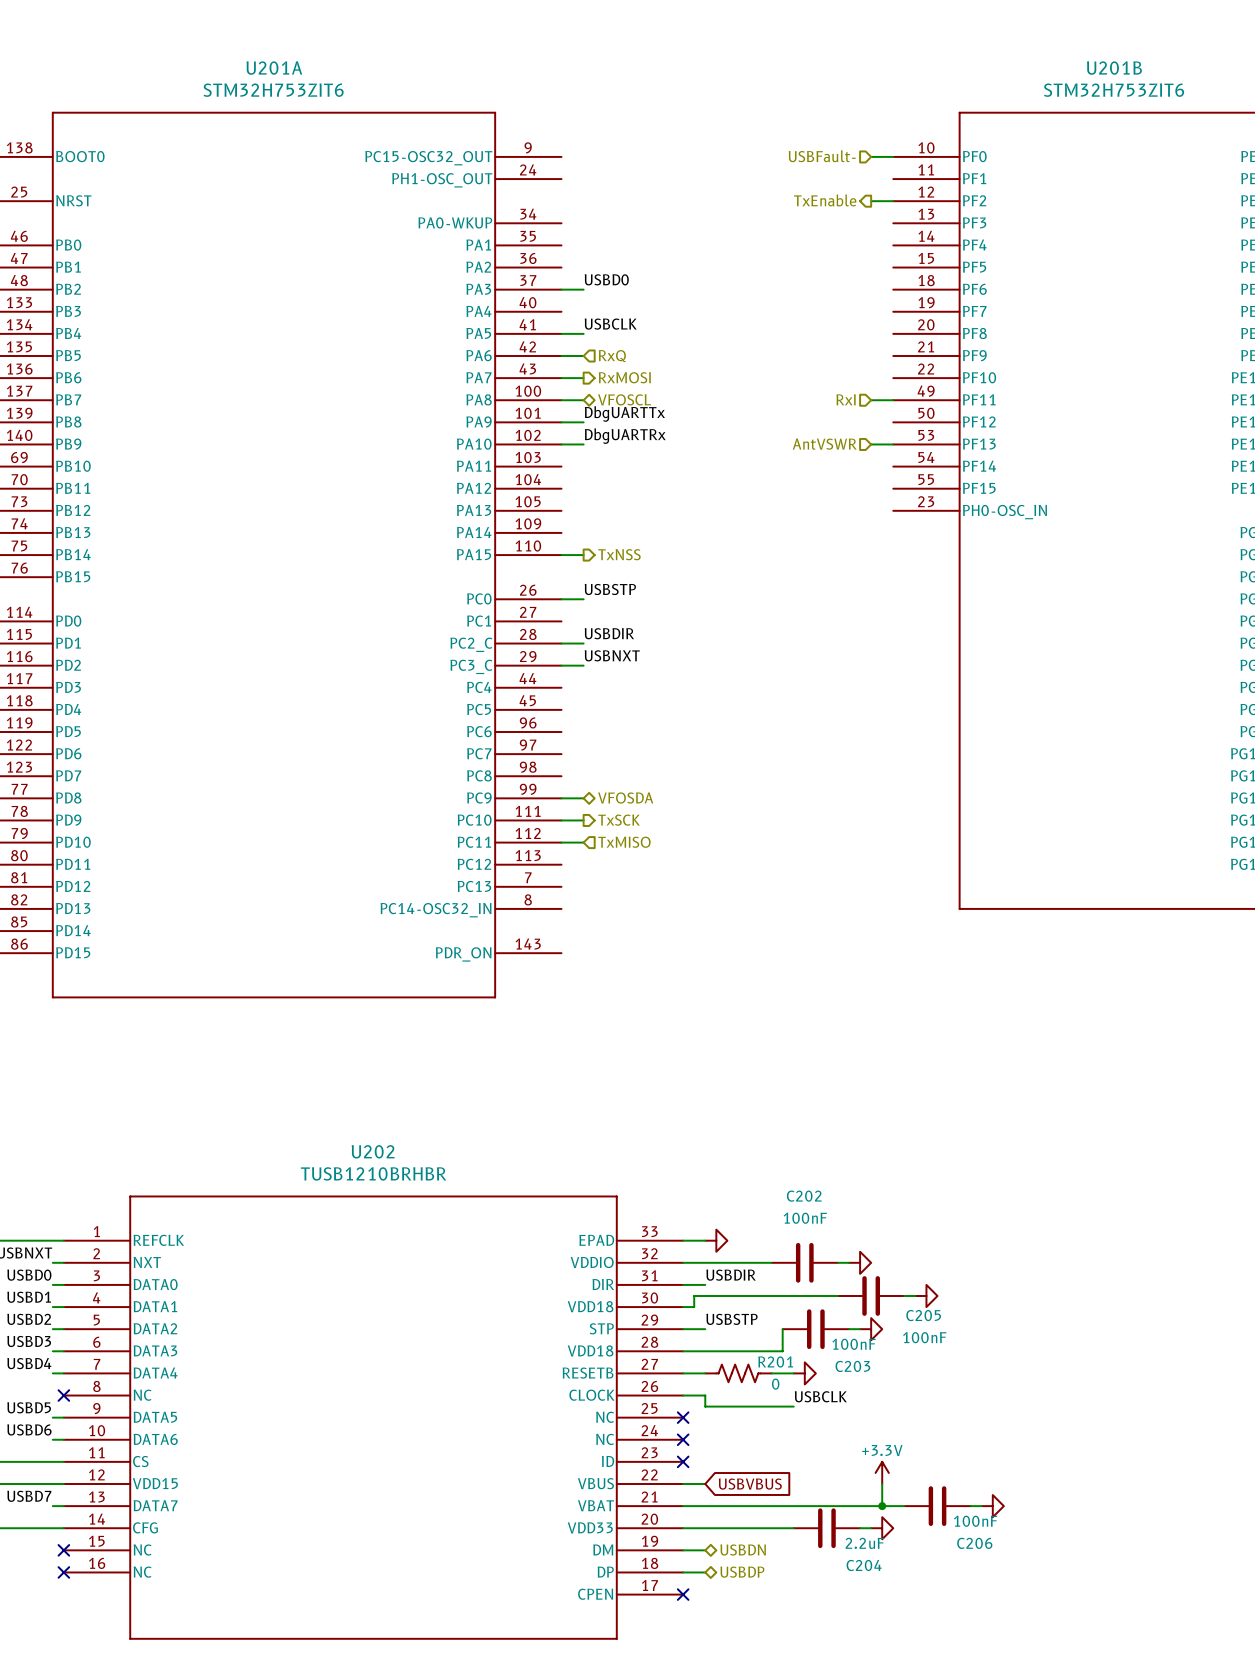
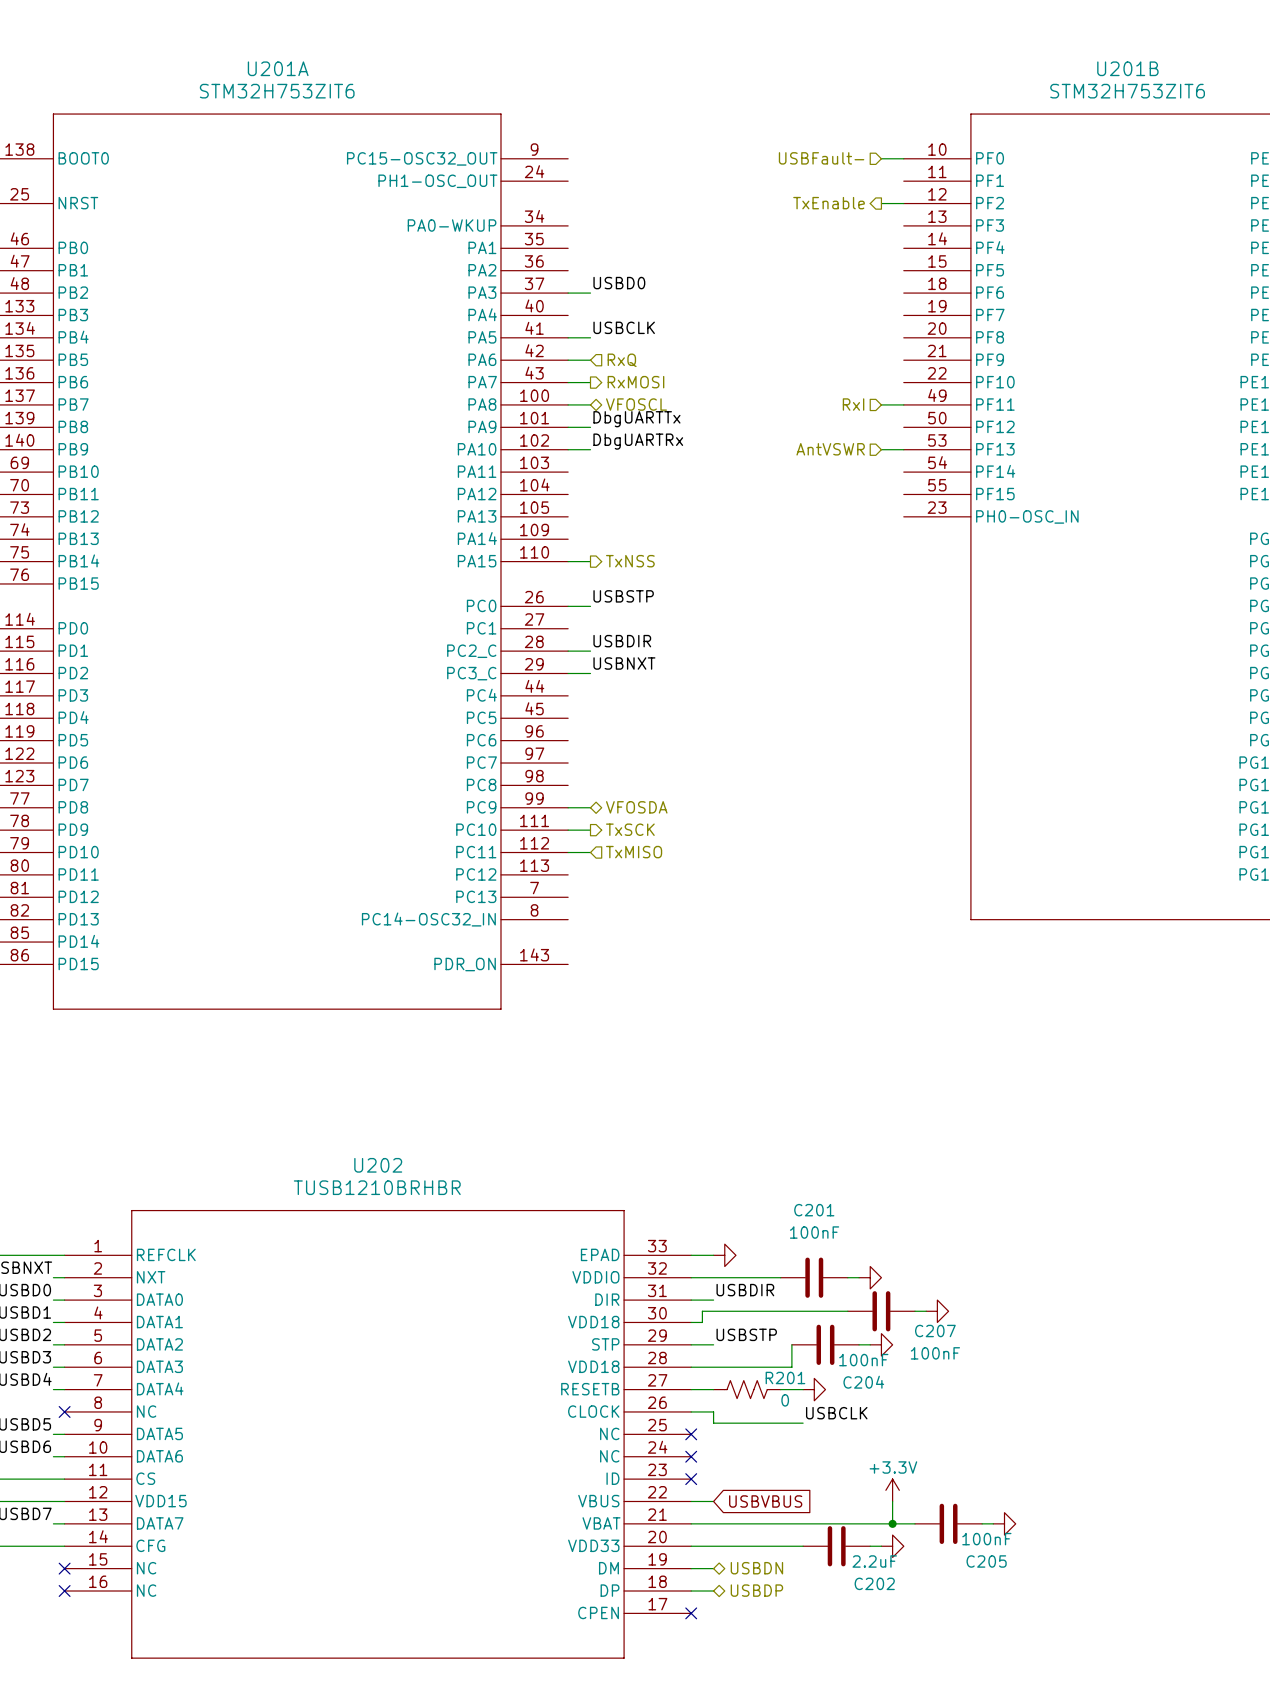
C202 name: C202 (804, 1196) -> C201 (814, 1210)
C205 name: C205 (923, 1315) -> C207 (935, 1330)
C203 name: C203 (852, 1366) -> C204 (863, 1382)
C206 name: C206 (974, 1543) -> C205 (986, 1561)
C204 name: C204 (864, 1565) -> C202 (874, 1583)

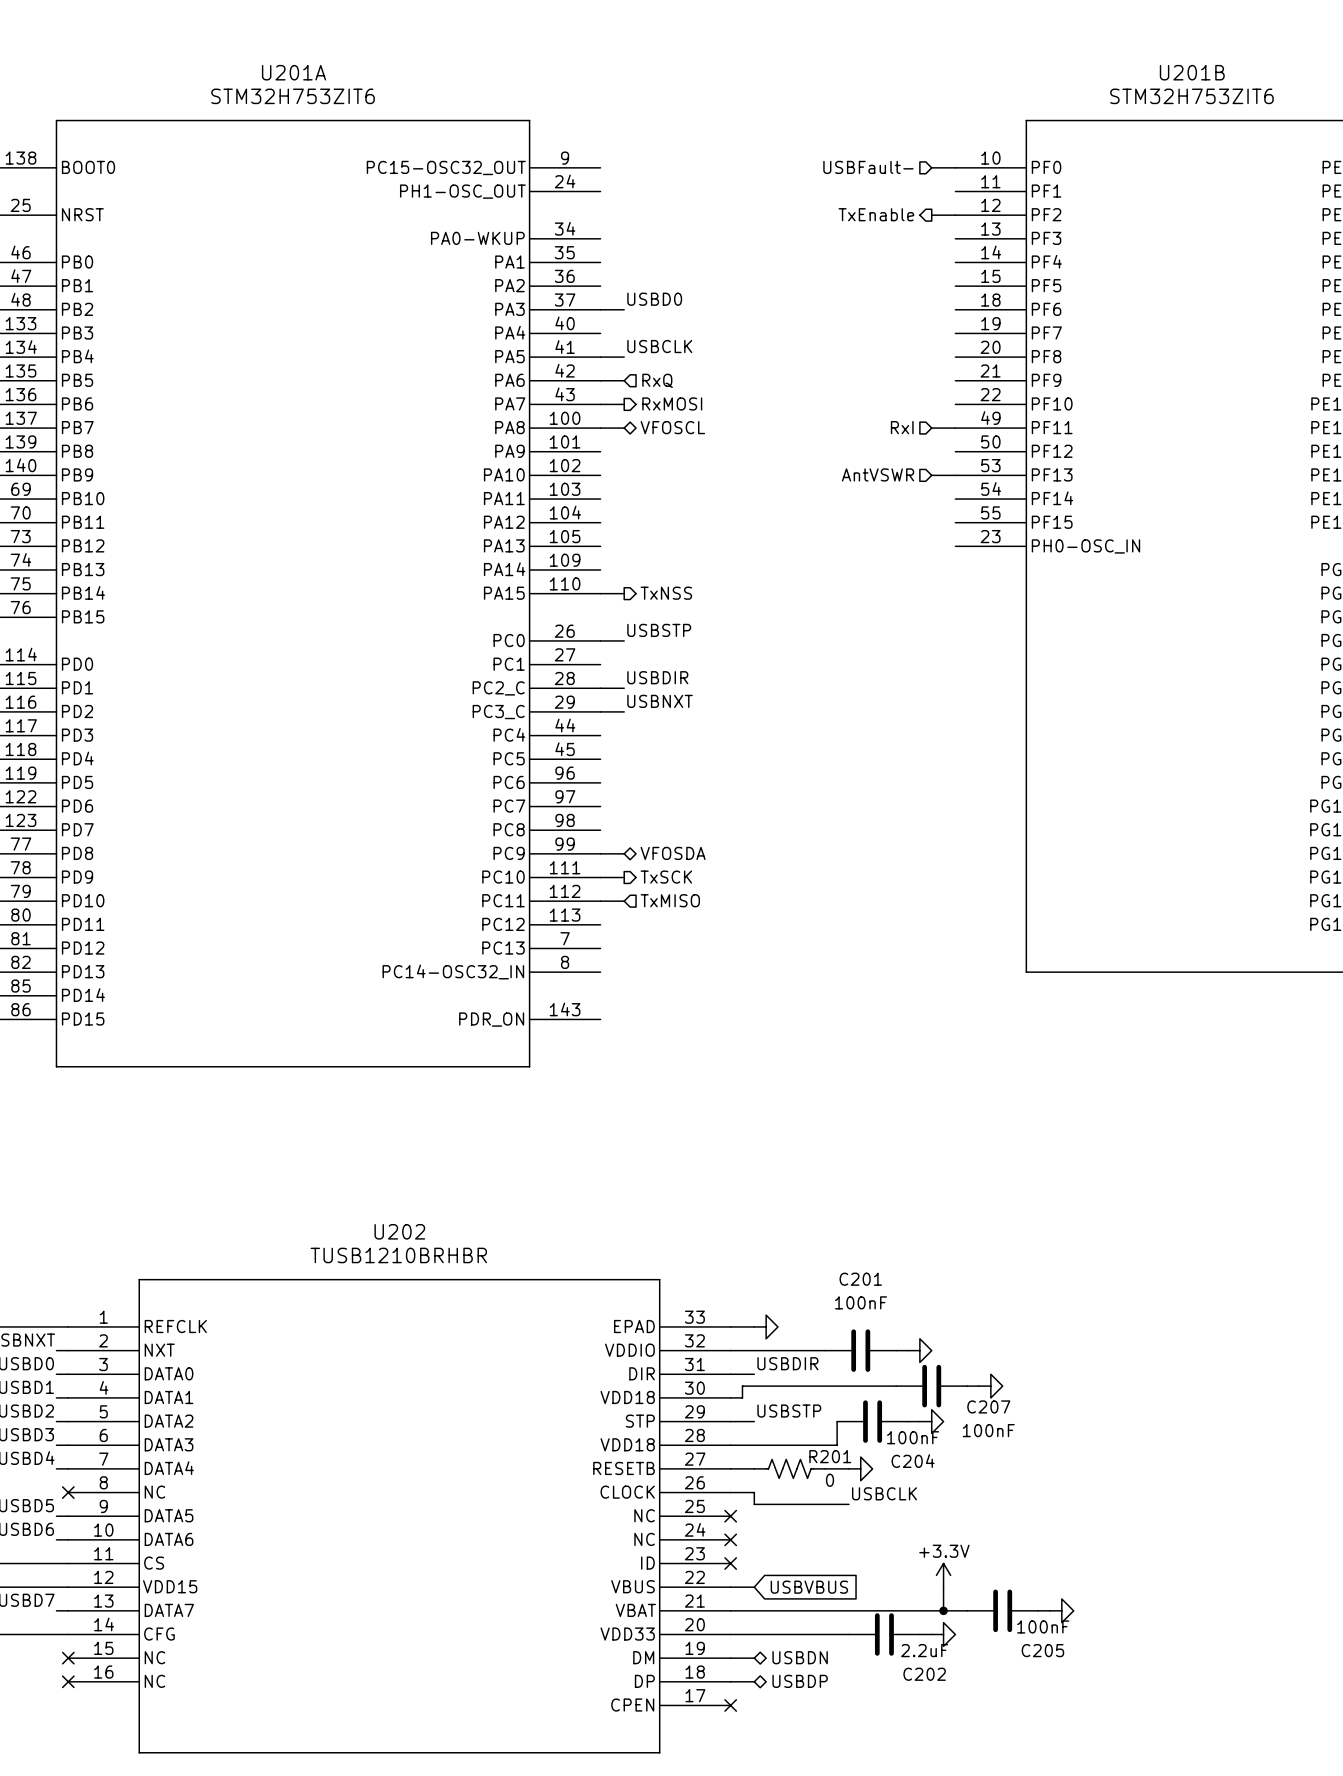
label: DbgUARTTx (636, 419) -> none
wire: (568, 427) (590, 427) -> none
label: DbgUARTRx (638, 441) -> none
wire: (568, 449) (590, 449) -> none

